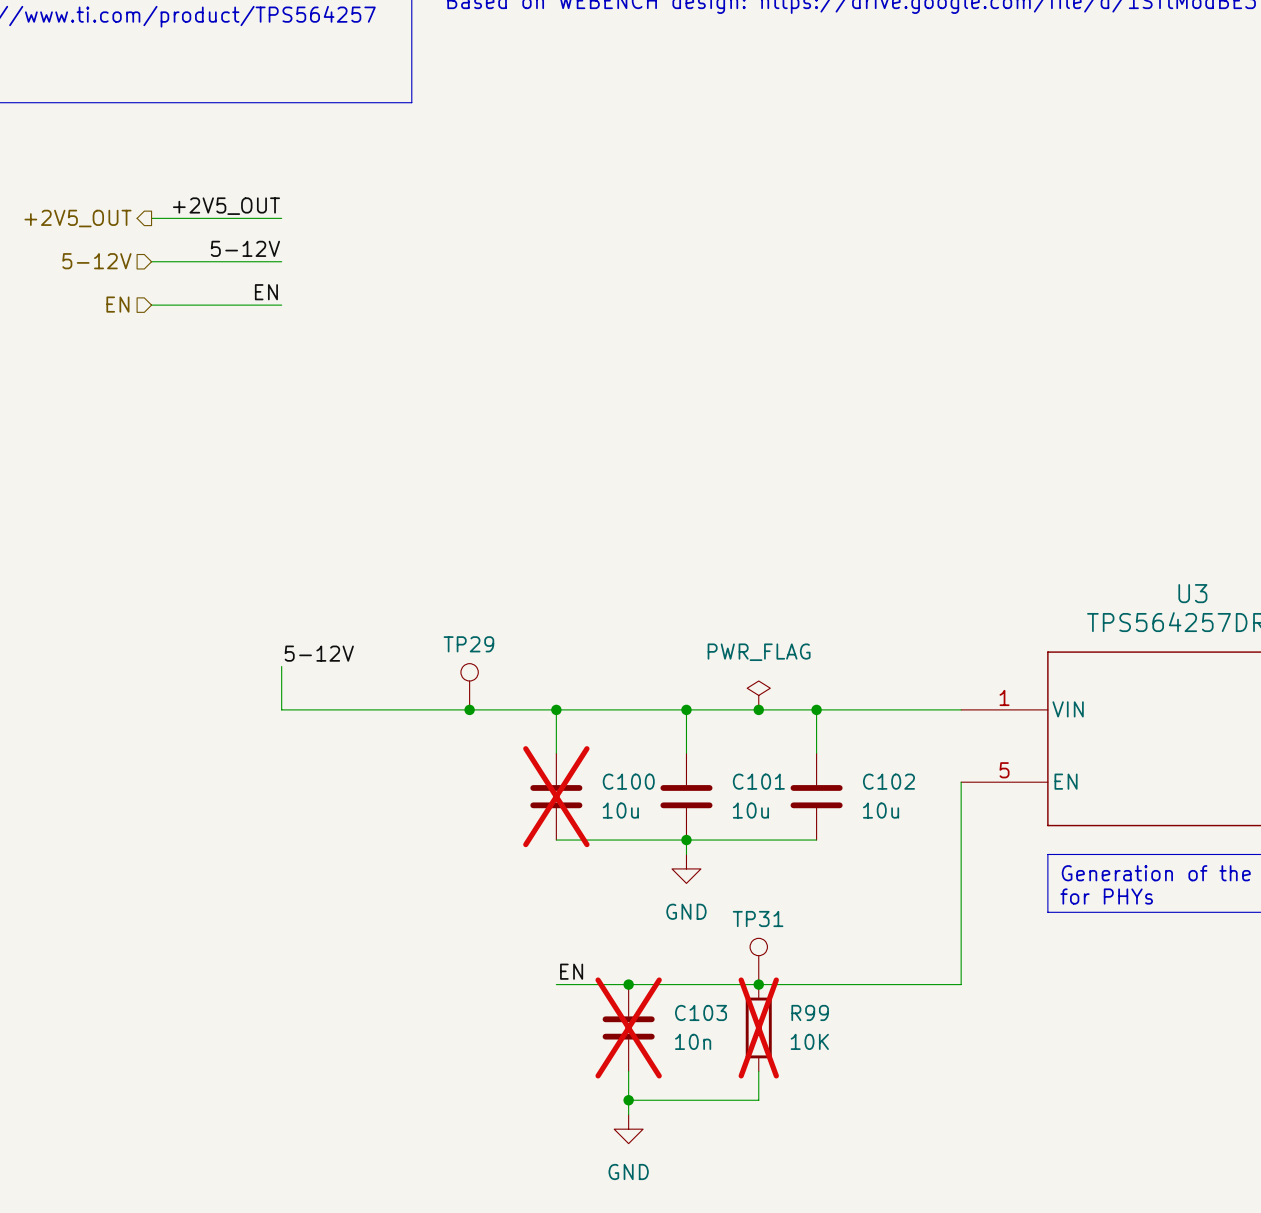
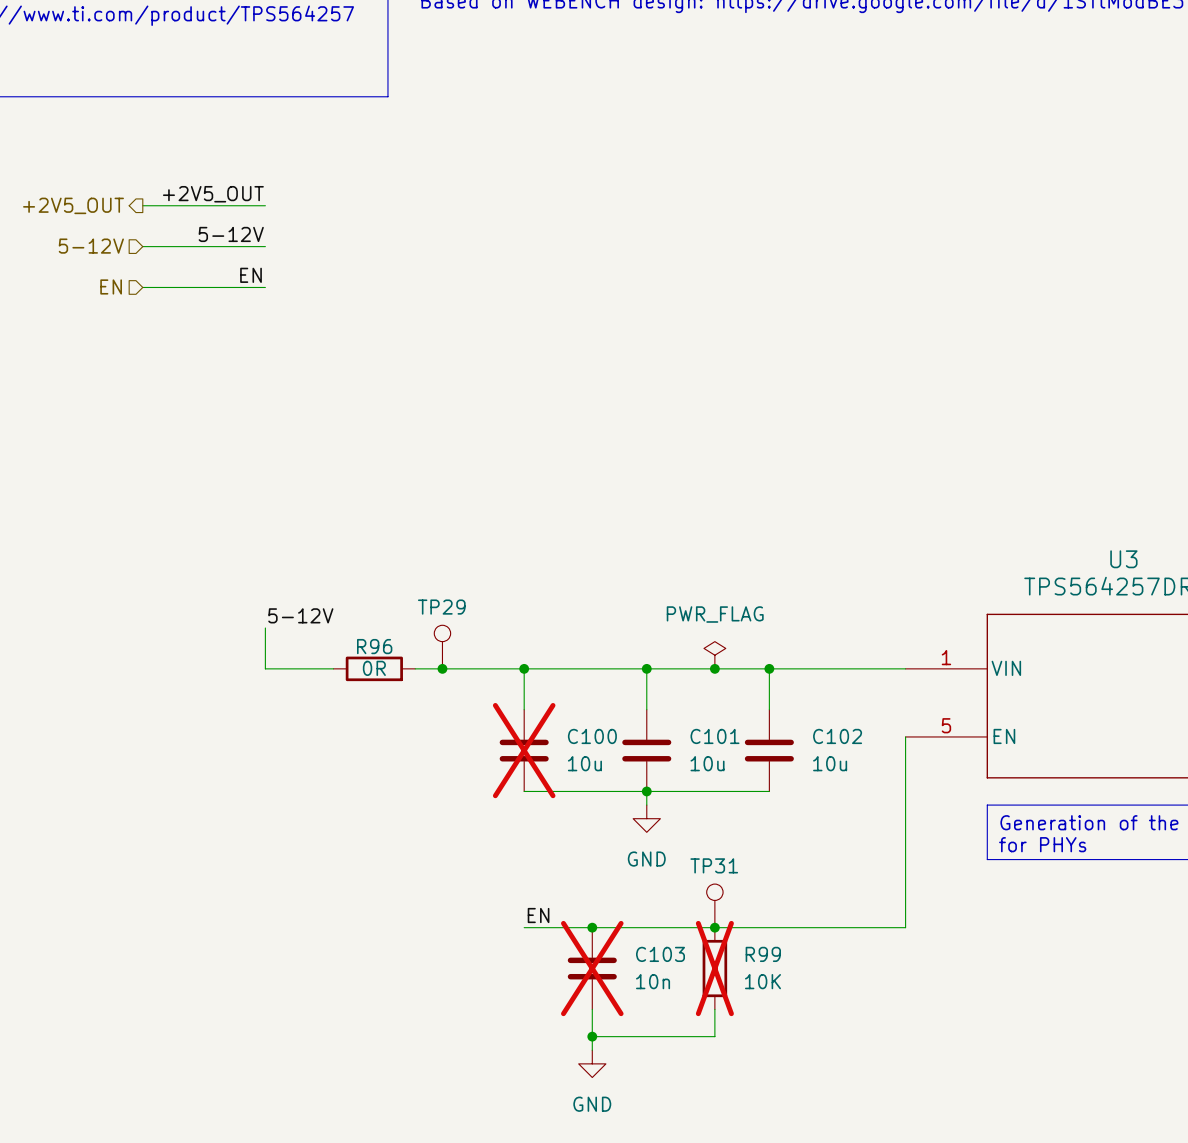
wire: (353, 709) (440, 709) -> none
R96: none -> 0R (374, 668)

